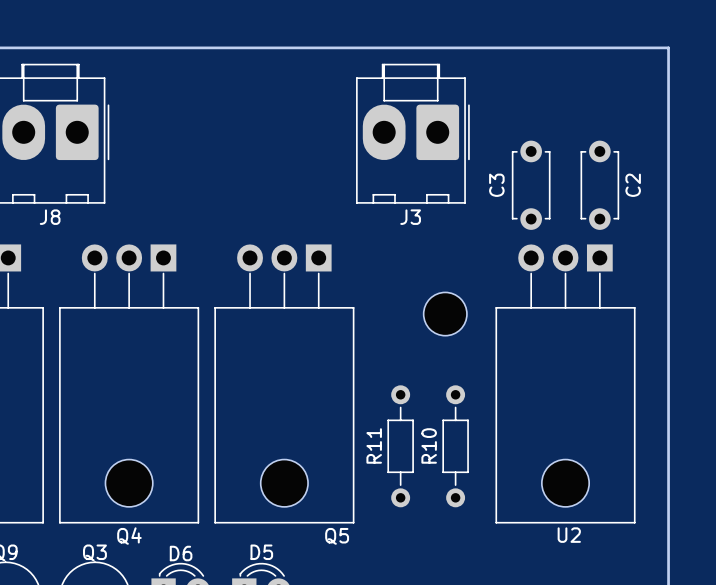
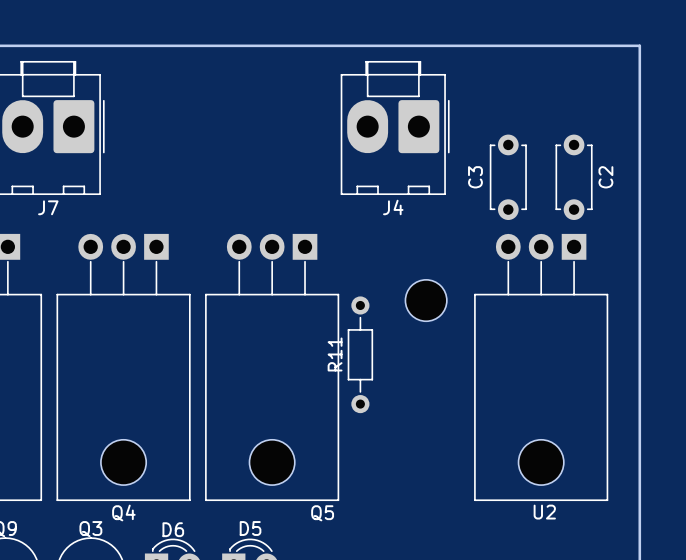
J8 name: J8 (50, 217) -> J7 (48, 207)
J3 name: J3 (410, 217) -> J4 (393, 207)
R11 position: (400, 446) -> (360, 354)
R10: (455, 446) -> none

